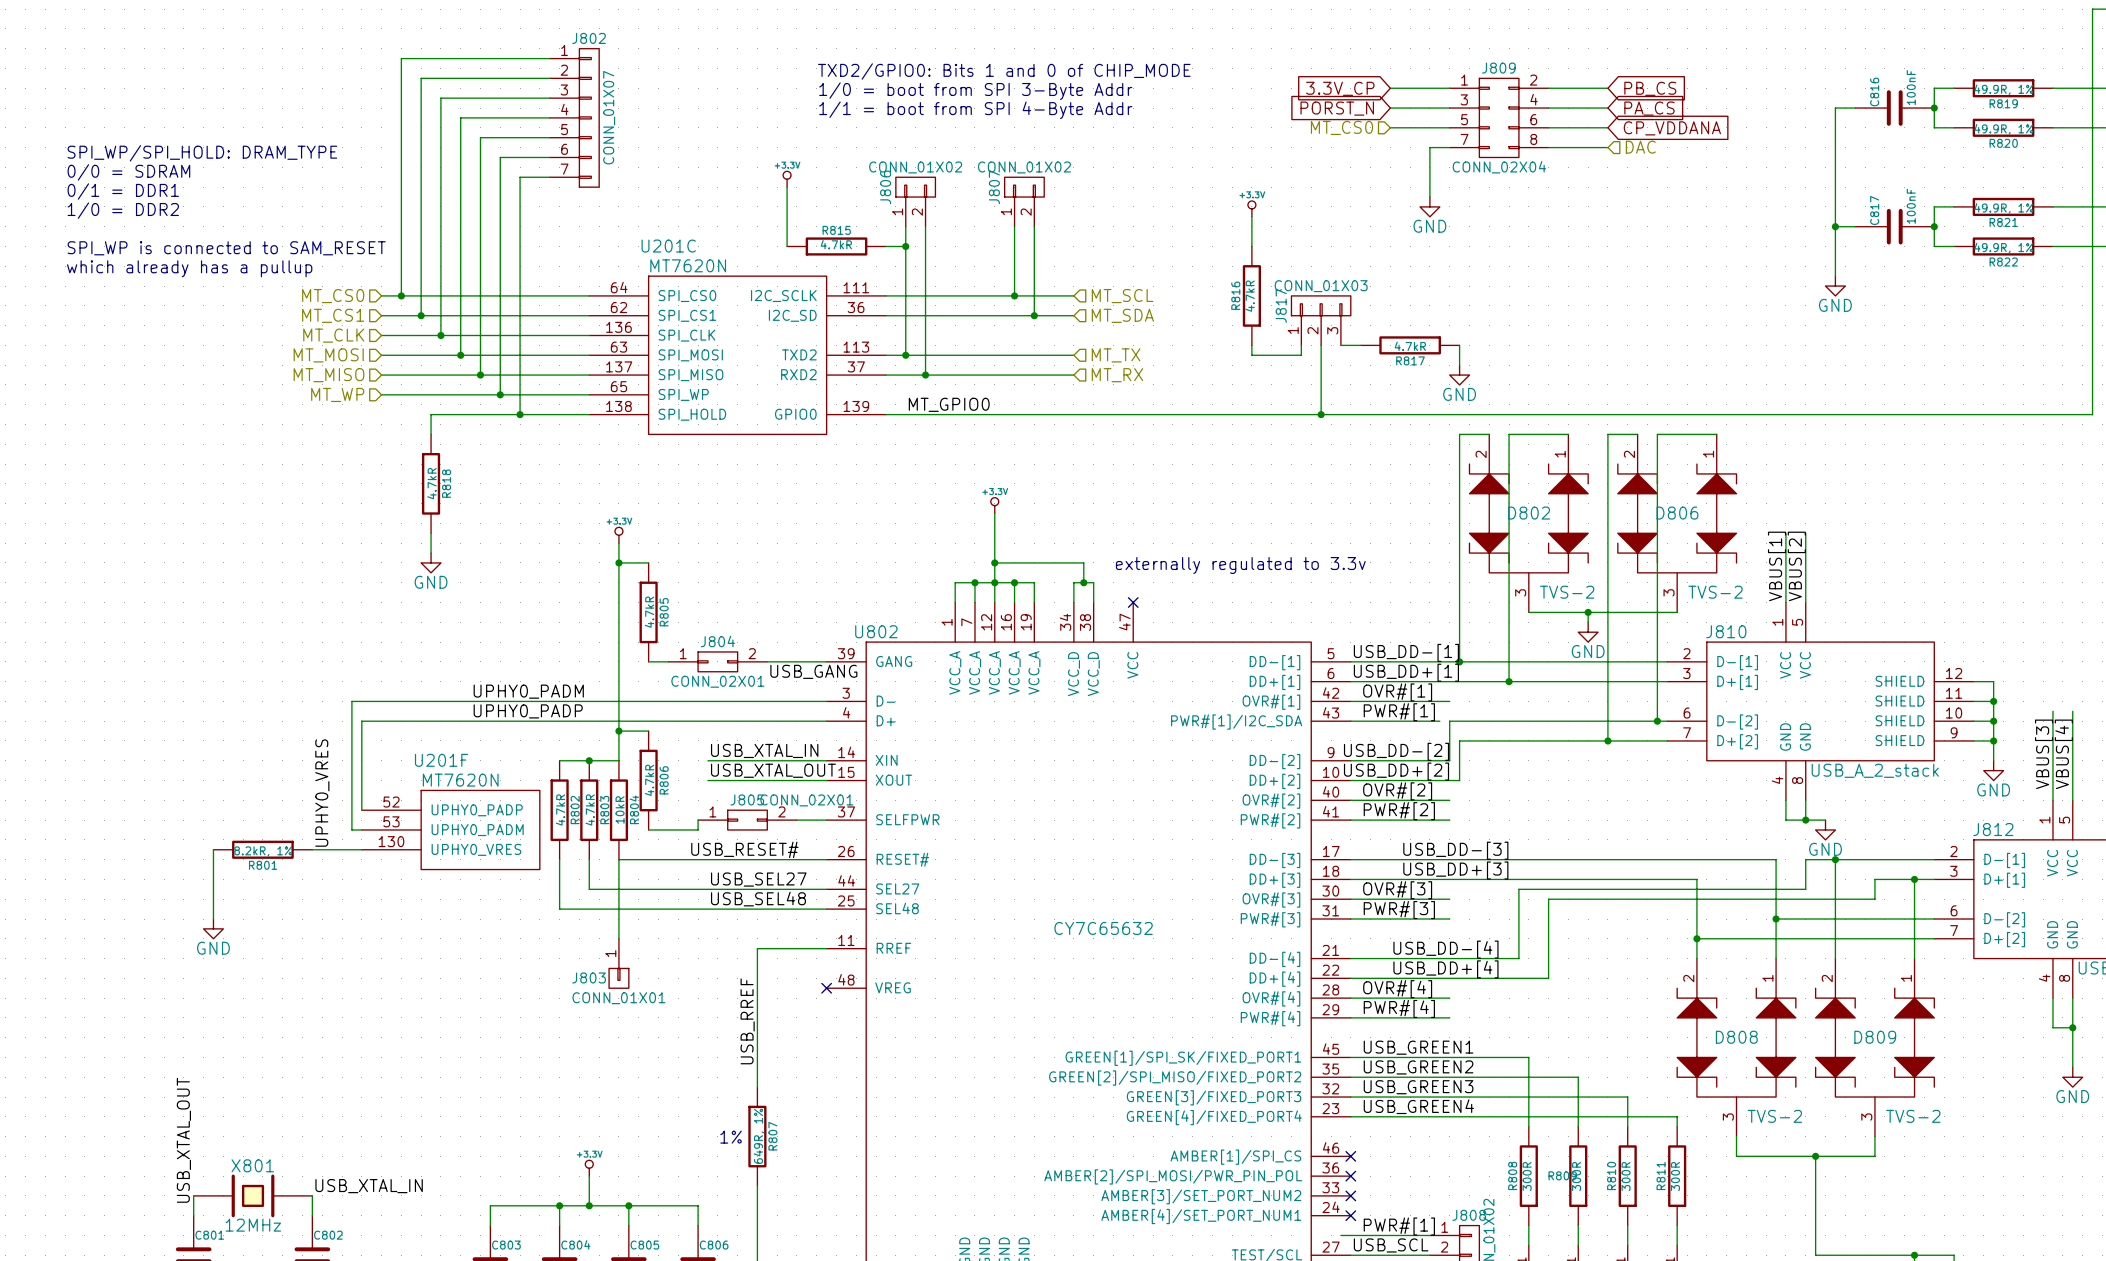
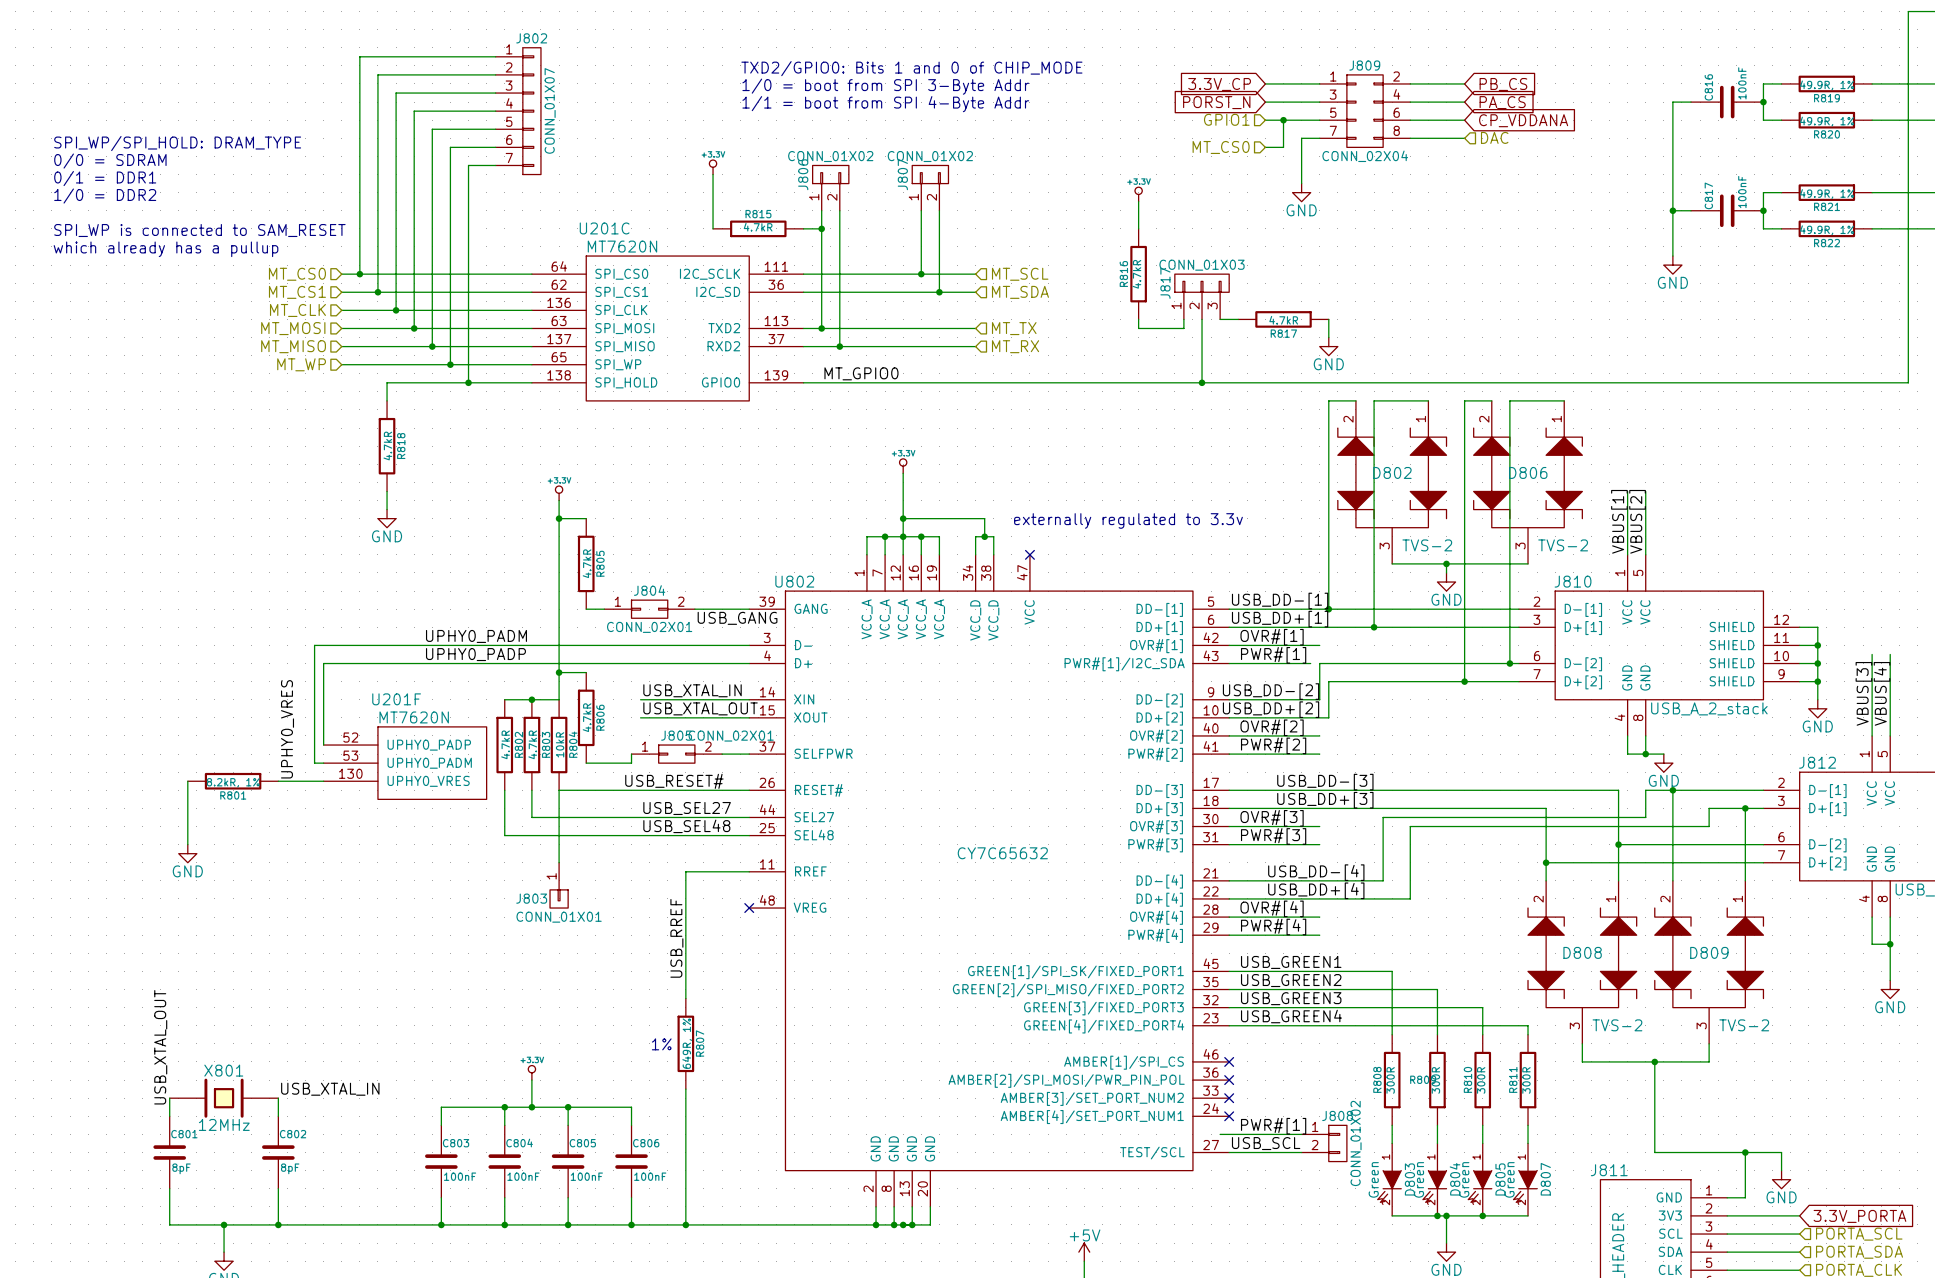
hierarchical label: MT_CS0 (1341, 127) -> GPIO1 (1226, 119)
wire: none -> (1283, 120) (1283, 147) (1265, 147)
junction: none -> (1283, 120)
hierarchical label: none -> MT_CS0 (1221, 147)

